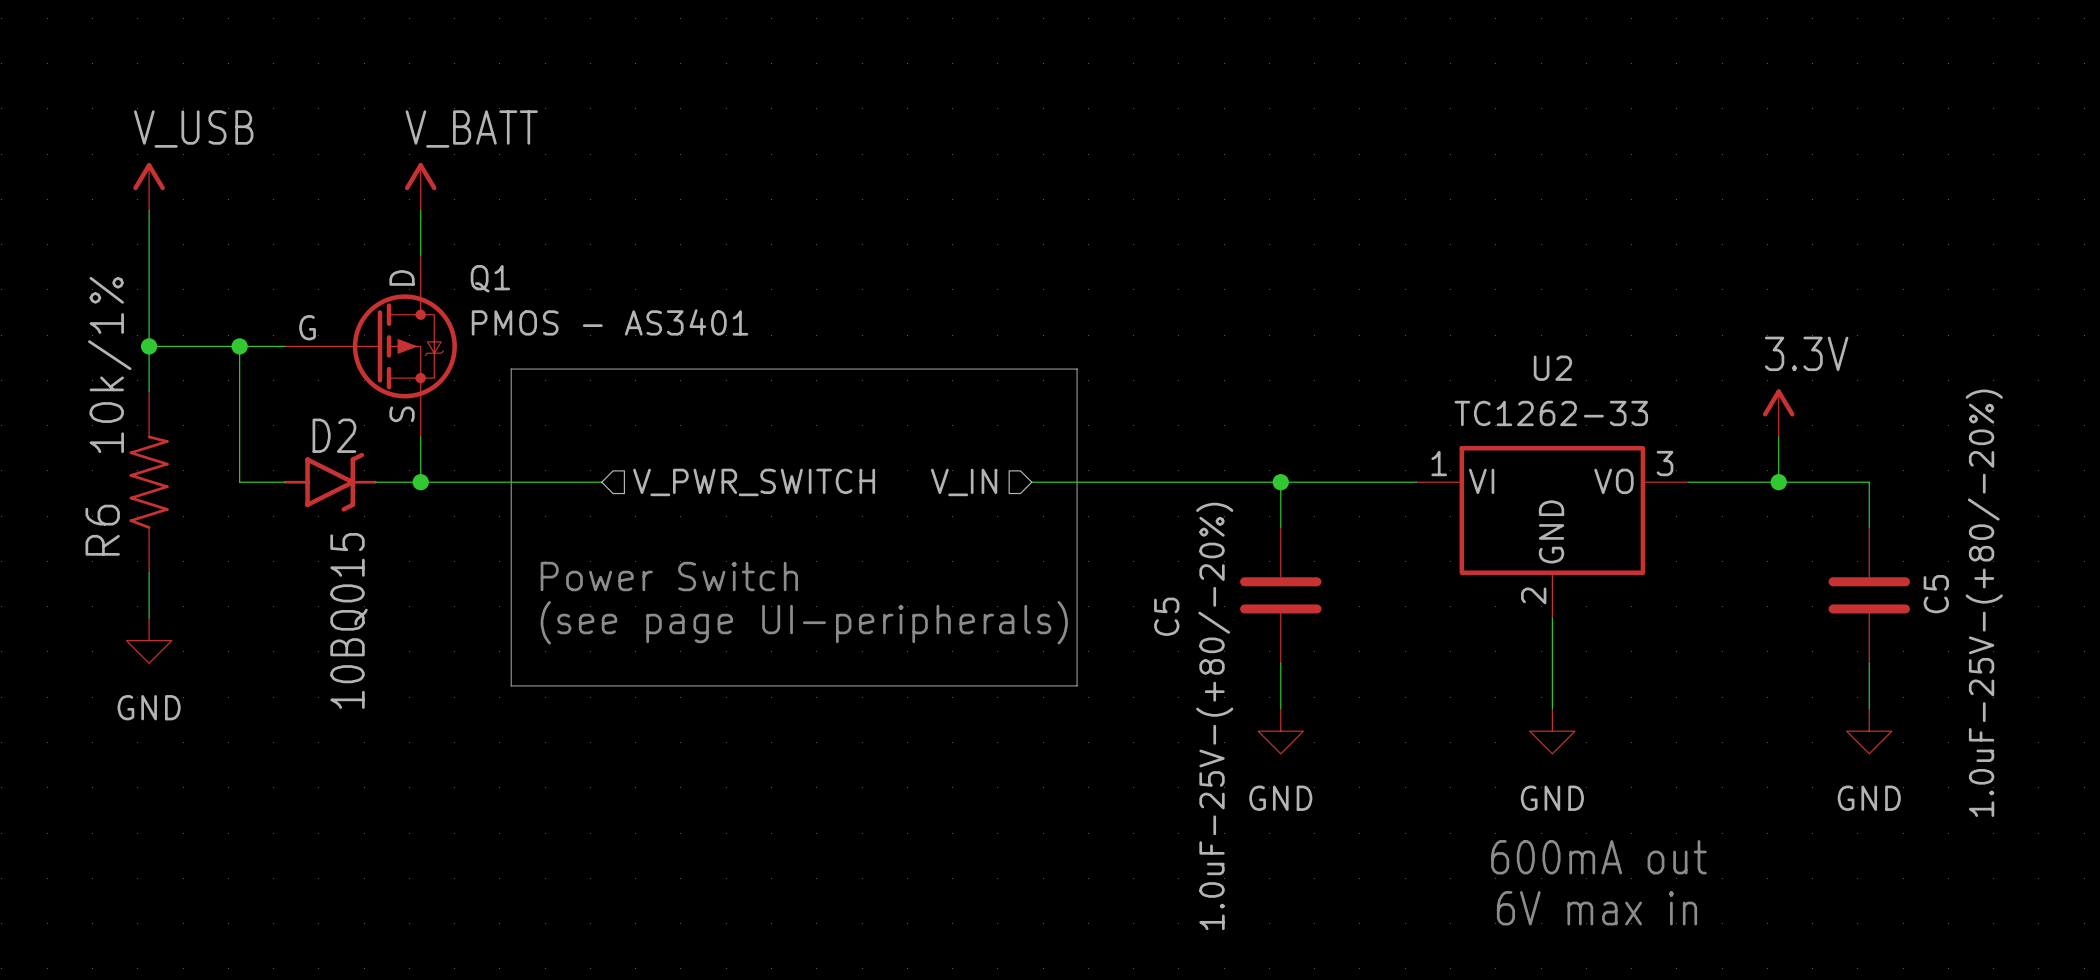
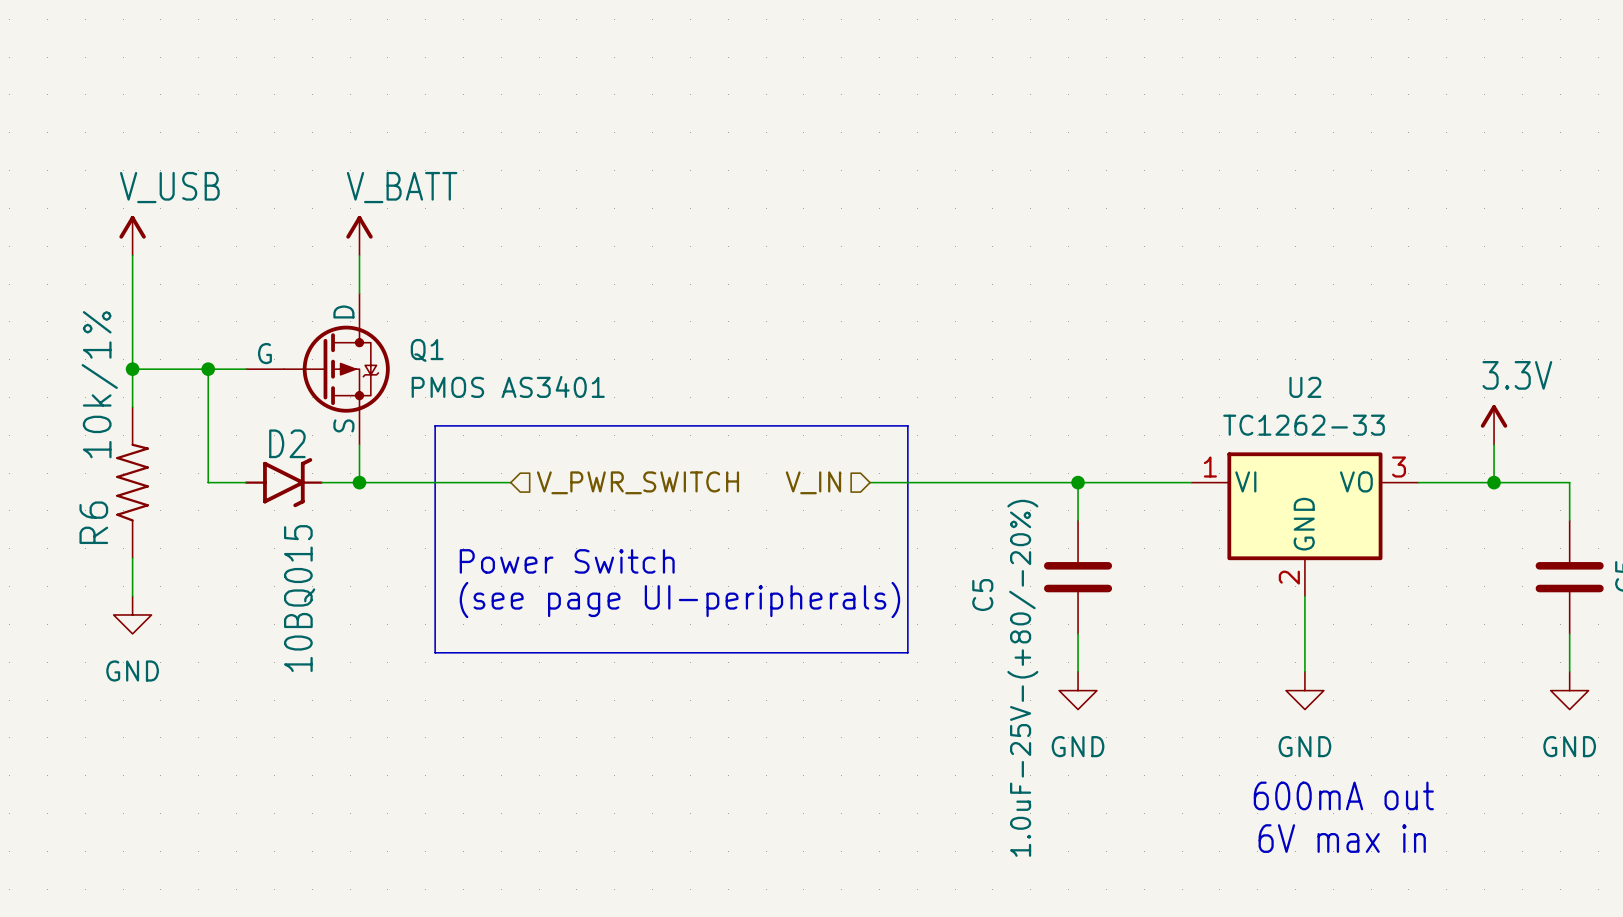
Q1 name position: Q1 (490, 278) -> Q1 (427, 350)
Q1 value: PMOS - AS3401 (610, 322) -> PMOS AS3401 (508, 386)
line: (511, 414) (511, 369) (1077, 369) (1077, 414) -> (435, 425) (907, 425)

